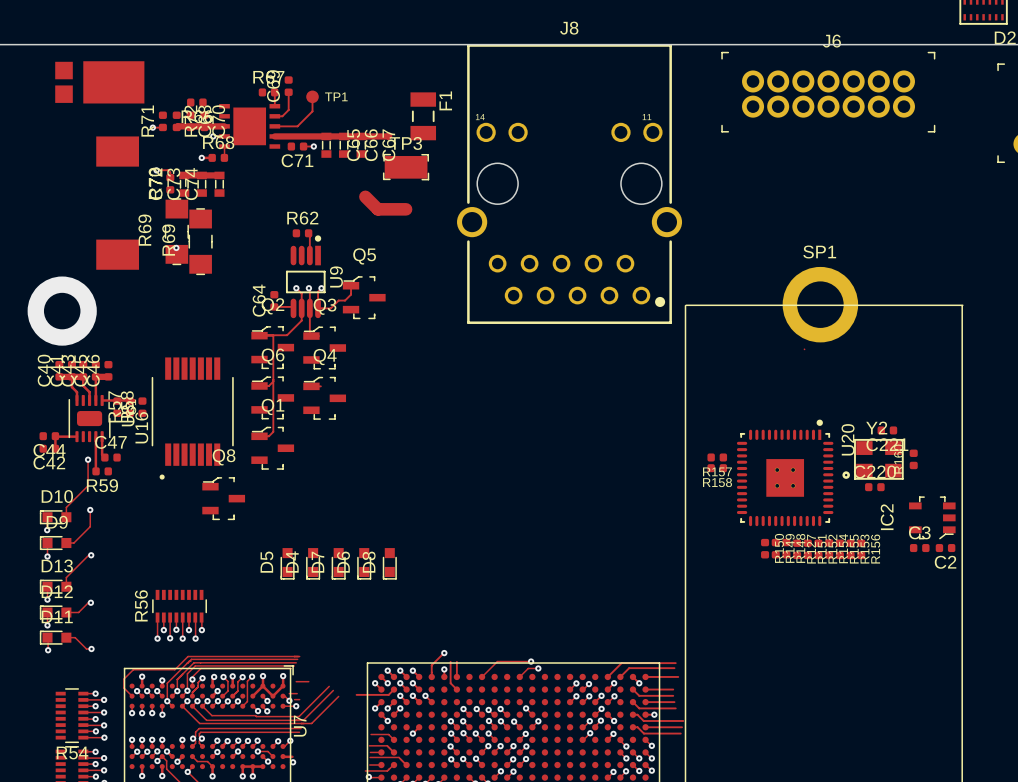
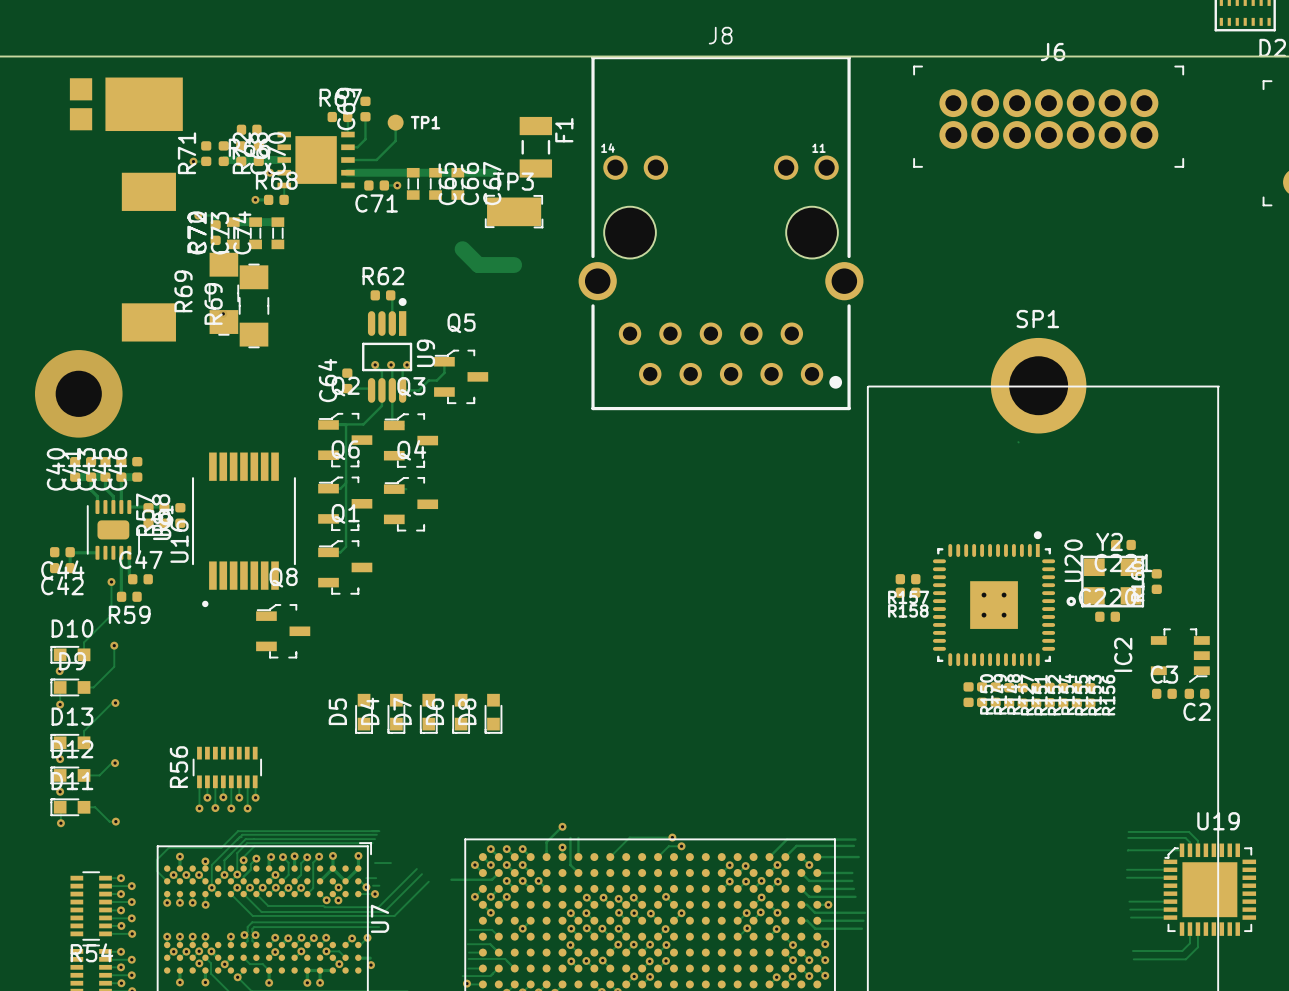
track: none -> (1128, 831) (1189, 831) (1197, 840) (1197, 850)
track: none -> (1128, 837) (1185, 837) (1189, 842) (1189, 850)
track: none -> (1182, 850) (1127, 850)
track: none -> (1127, 869) (1170, 869)
track: none -> (1127, 877) (1170, 877)
U19: none -> (1209, 889)
track: none -> (1129, 901) (1170, 901)
track: none -> (1130, 909) (1170, 909)
track: none -> (1130, 917) (1170, 917)
track: none -> (1189, 929) (1189, 943) (1182, 950) (1132, 950)
track: none -> (1197, 929) (1197, 947) (1185, 959) (1133, 959)

